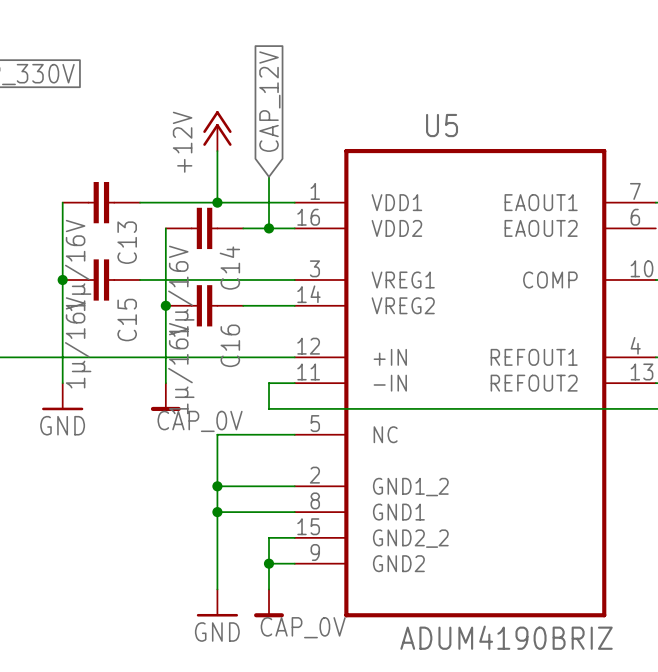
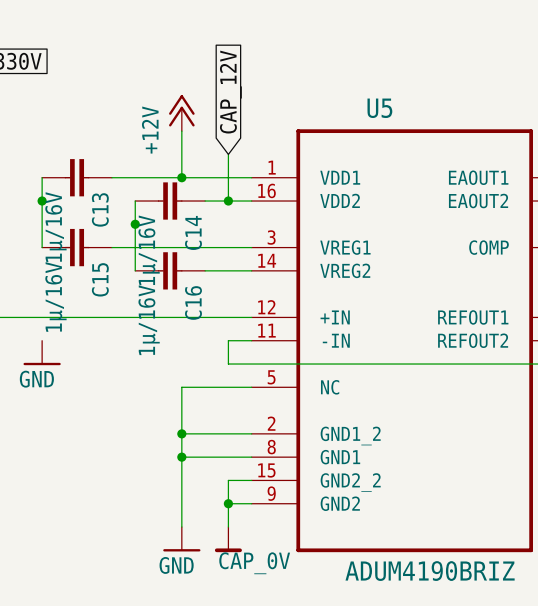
wire: (62, 280) (62, 383) -> none
junction position: (62, 280) -> (42, 201)
wire: (165, 305) (165, 383) -> none
junction position: (165, 305) -> (135, 224)
power symbol: CAP_0V (165, 397) -> none

